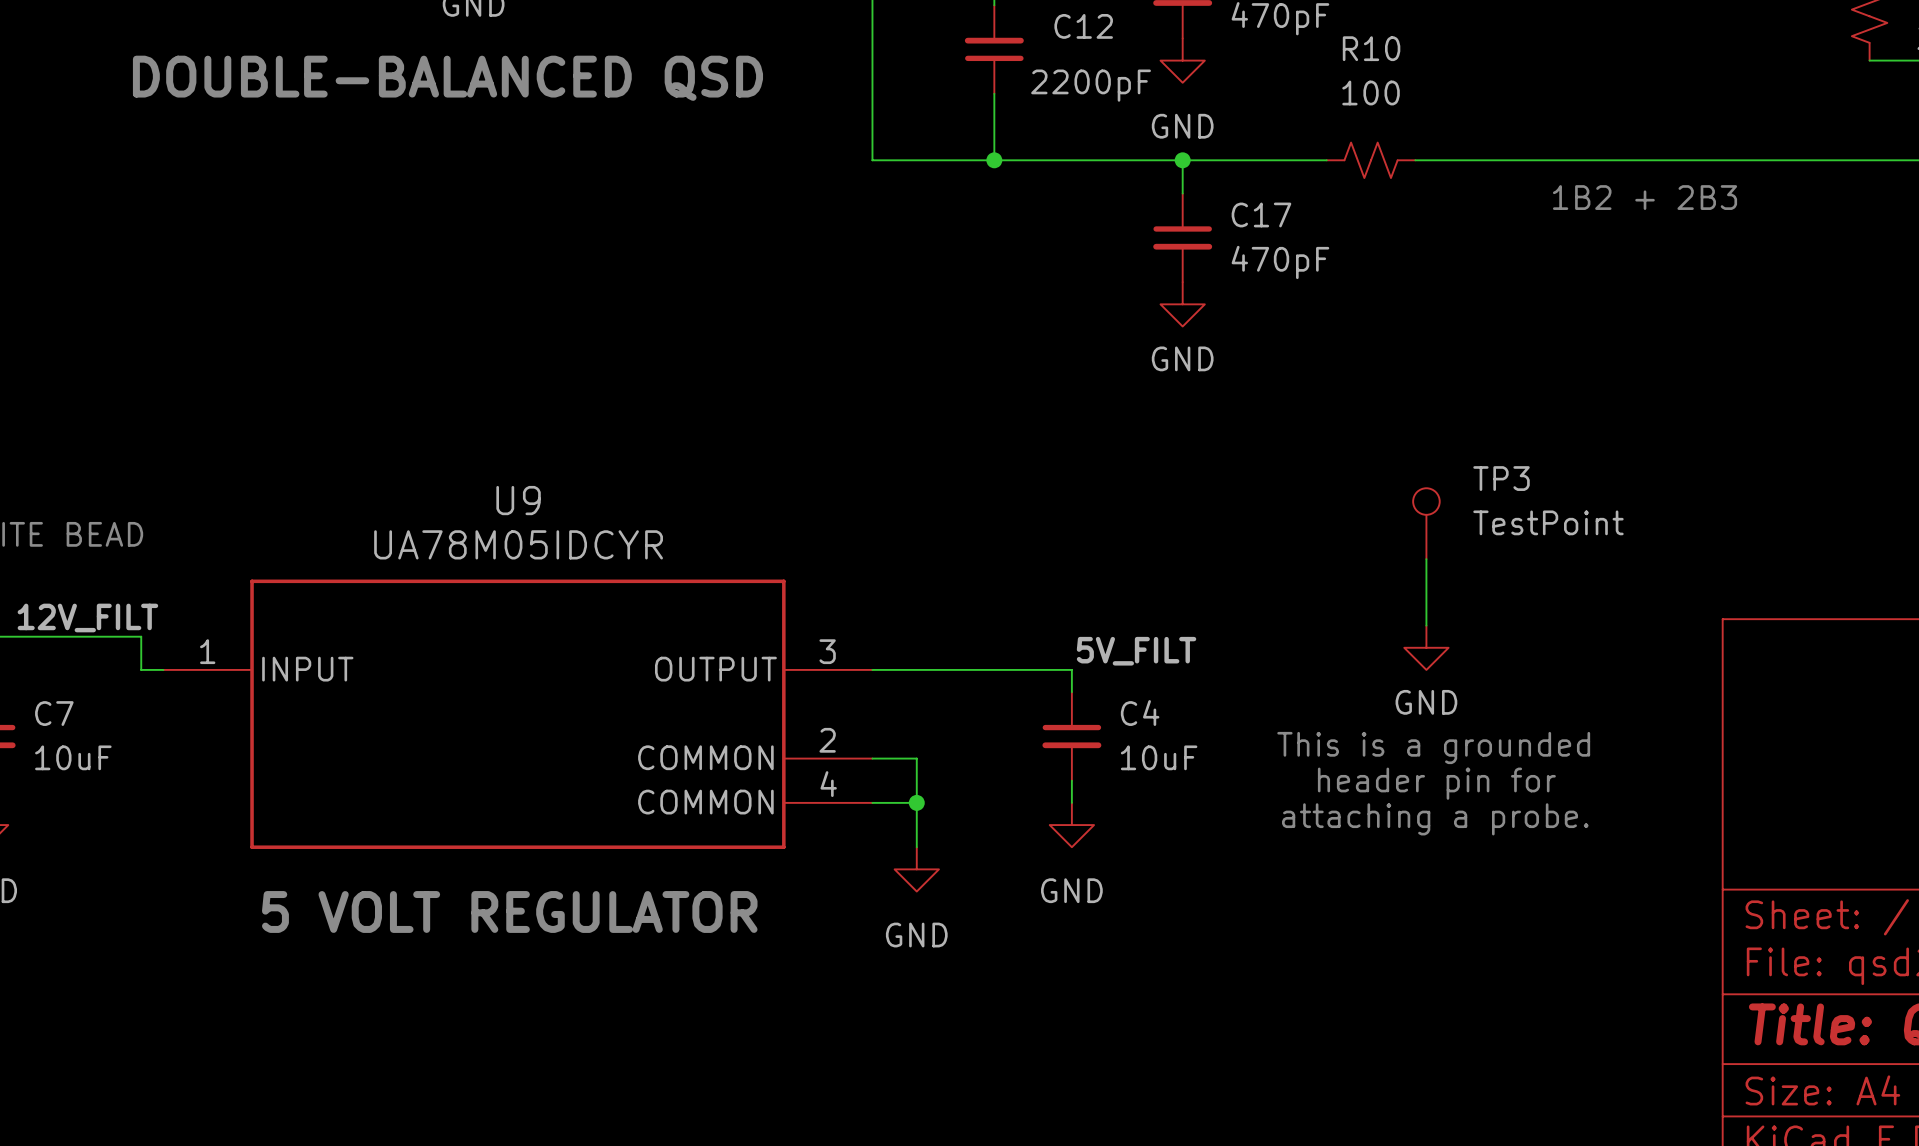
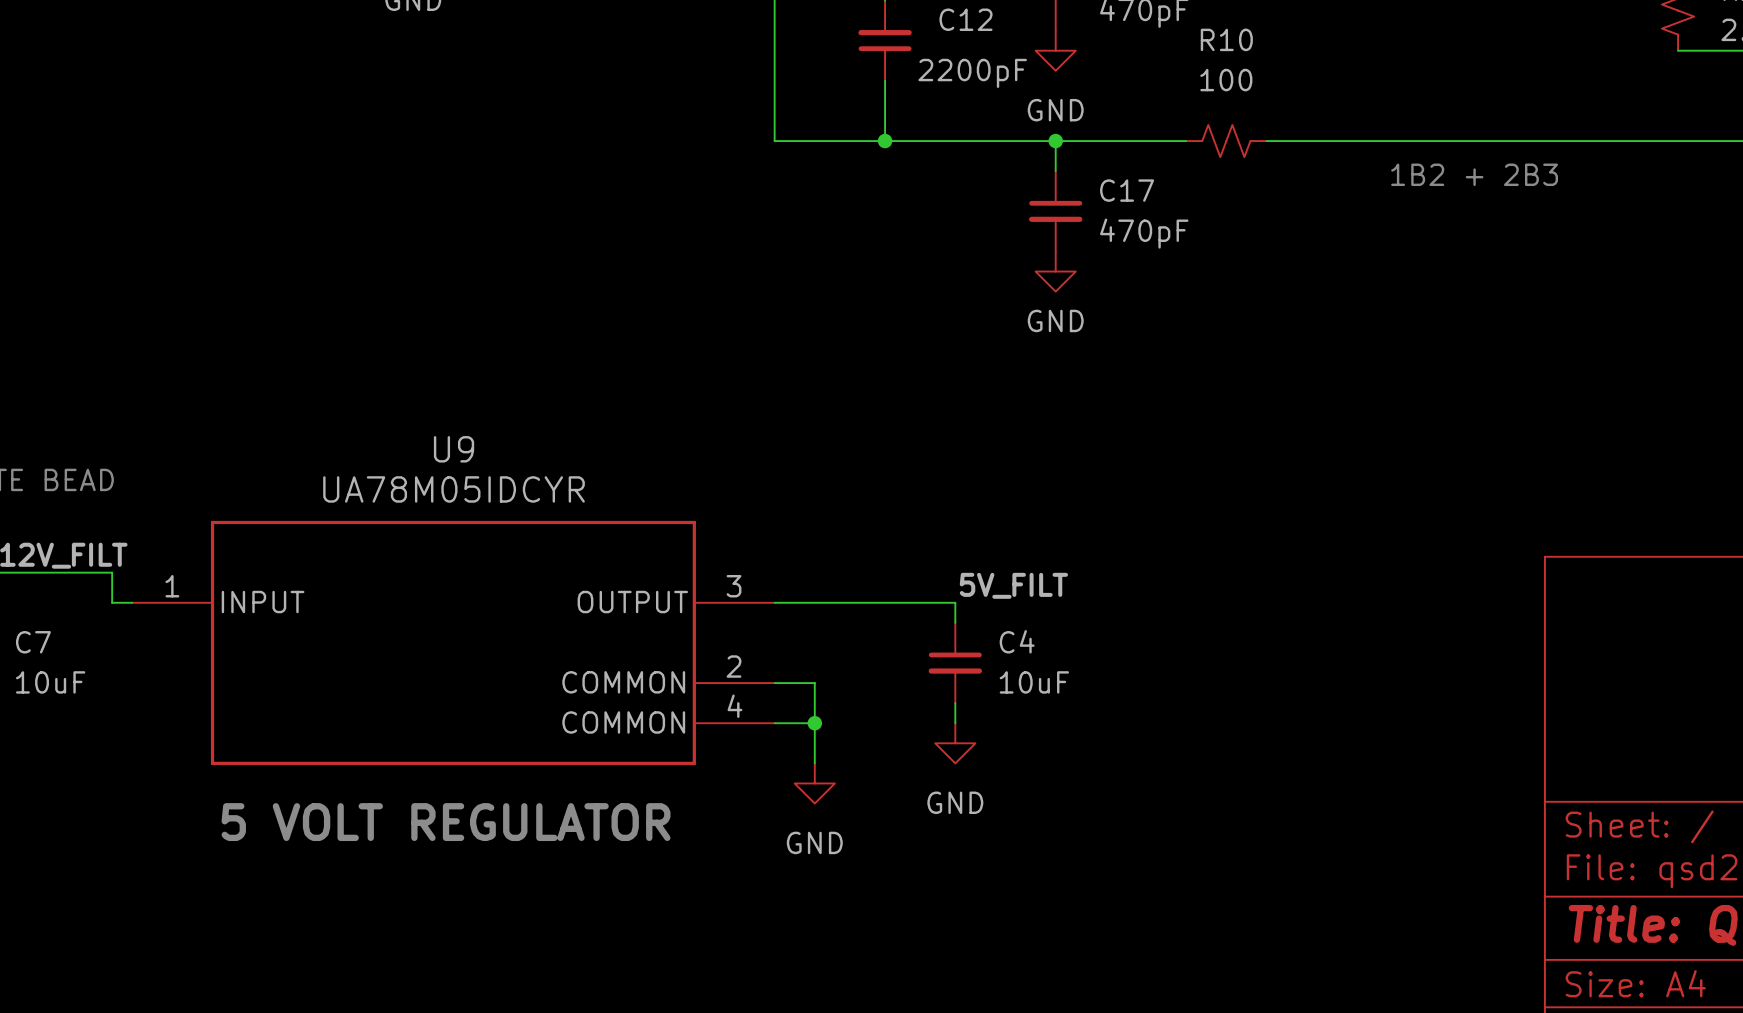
text: DOUBLE-BALANCED QSD (447, 78) -> none
TP3: TestPoint (1426, 523) -> none
wire: (1426, 559) (1426, 625) -> none
power symbol: GND (1426, 647) -> none
text: This is a grounded (1433, 747) -> none
text: header pin for (1436, 783) -> none
text: attaching a probe. (1435, 819) -> none

